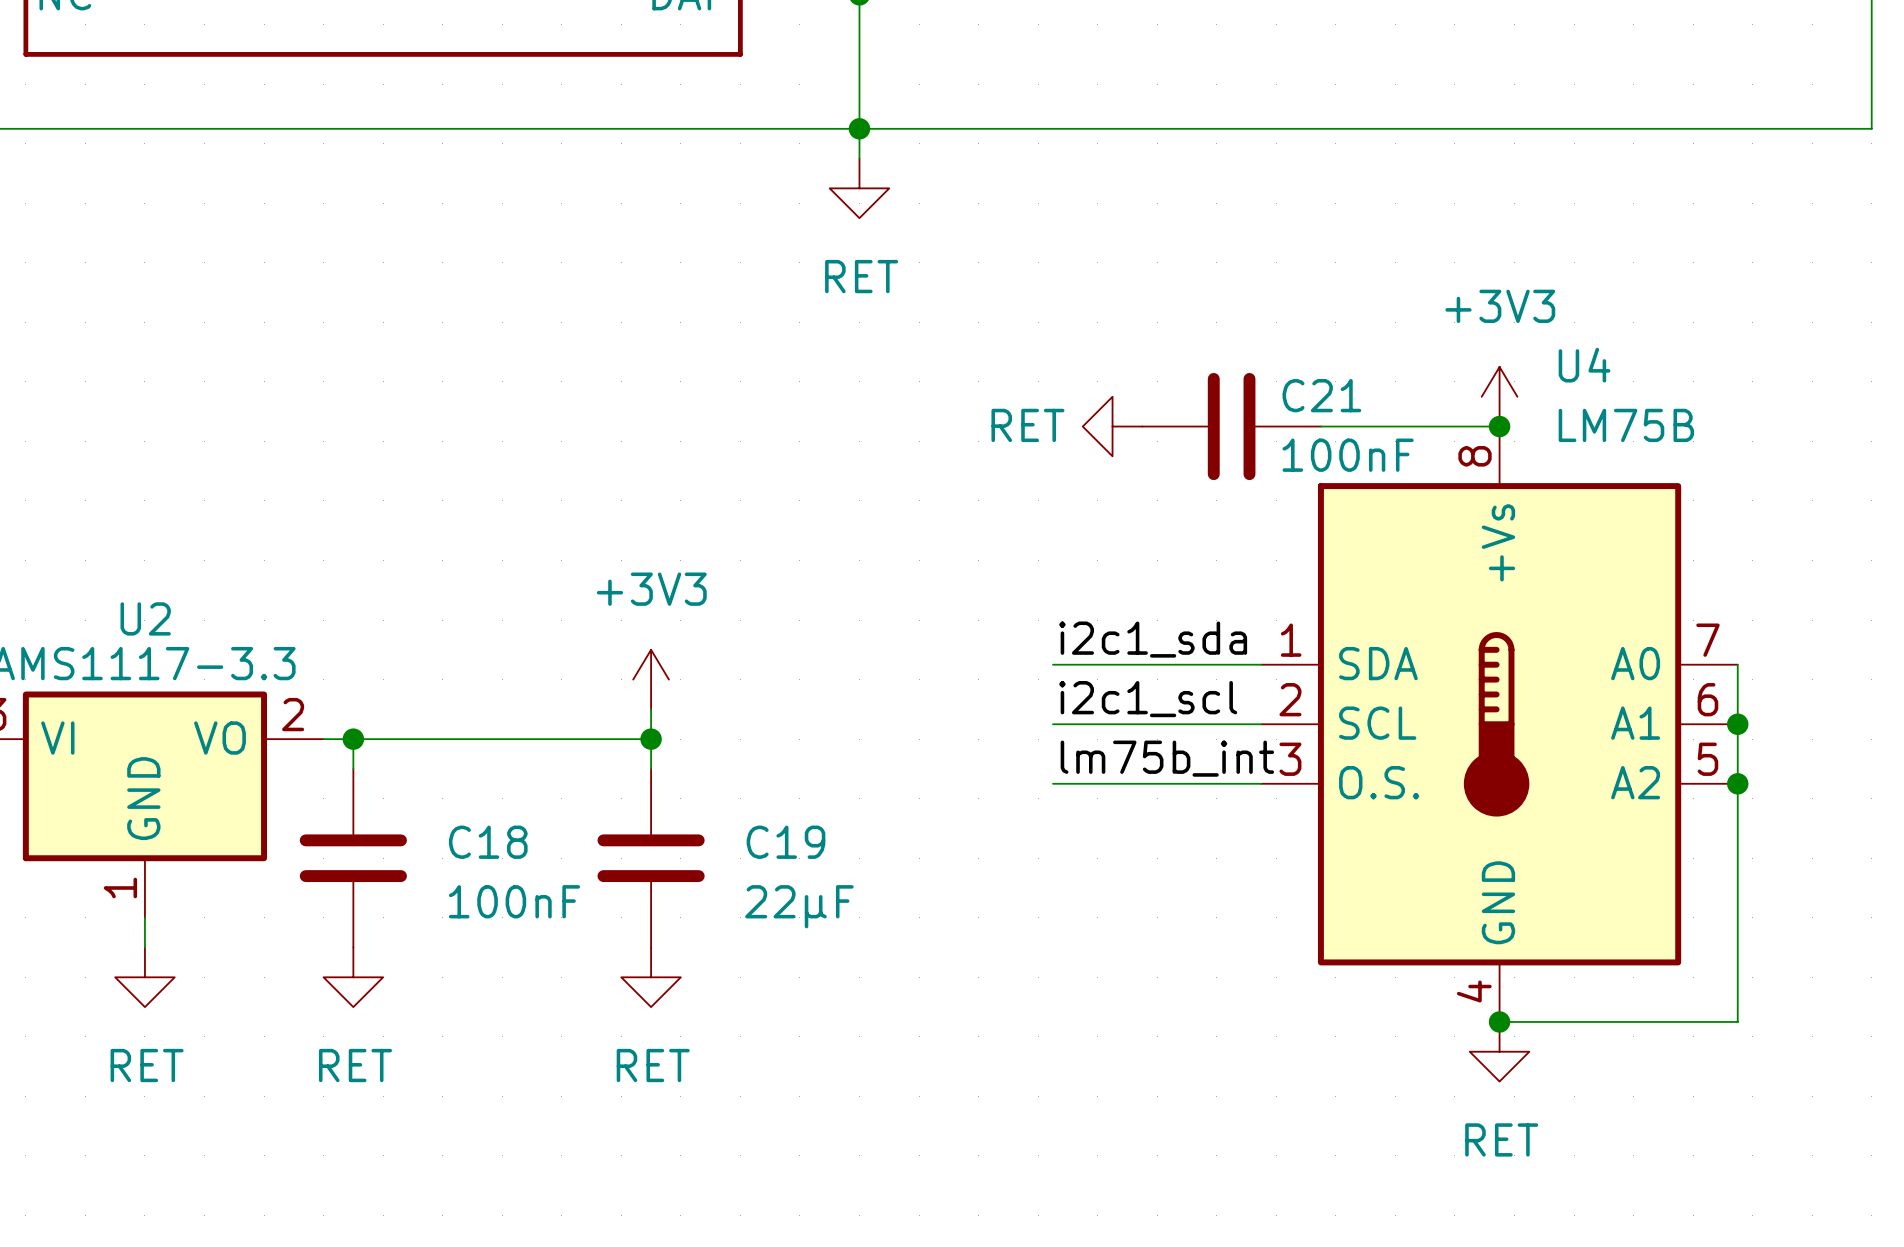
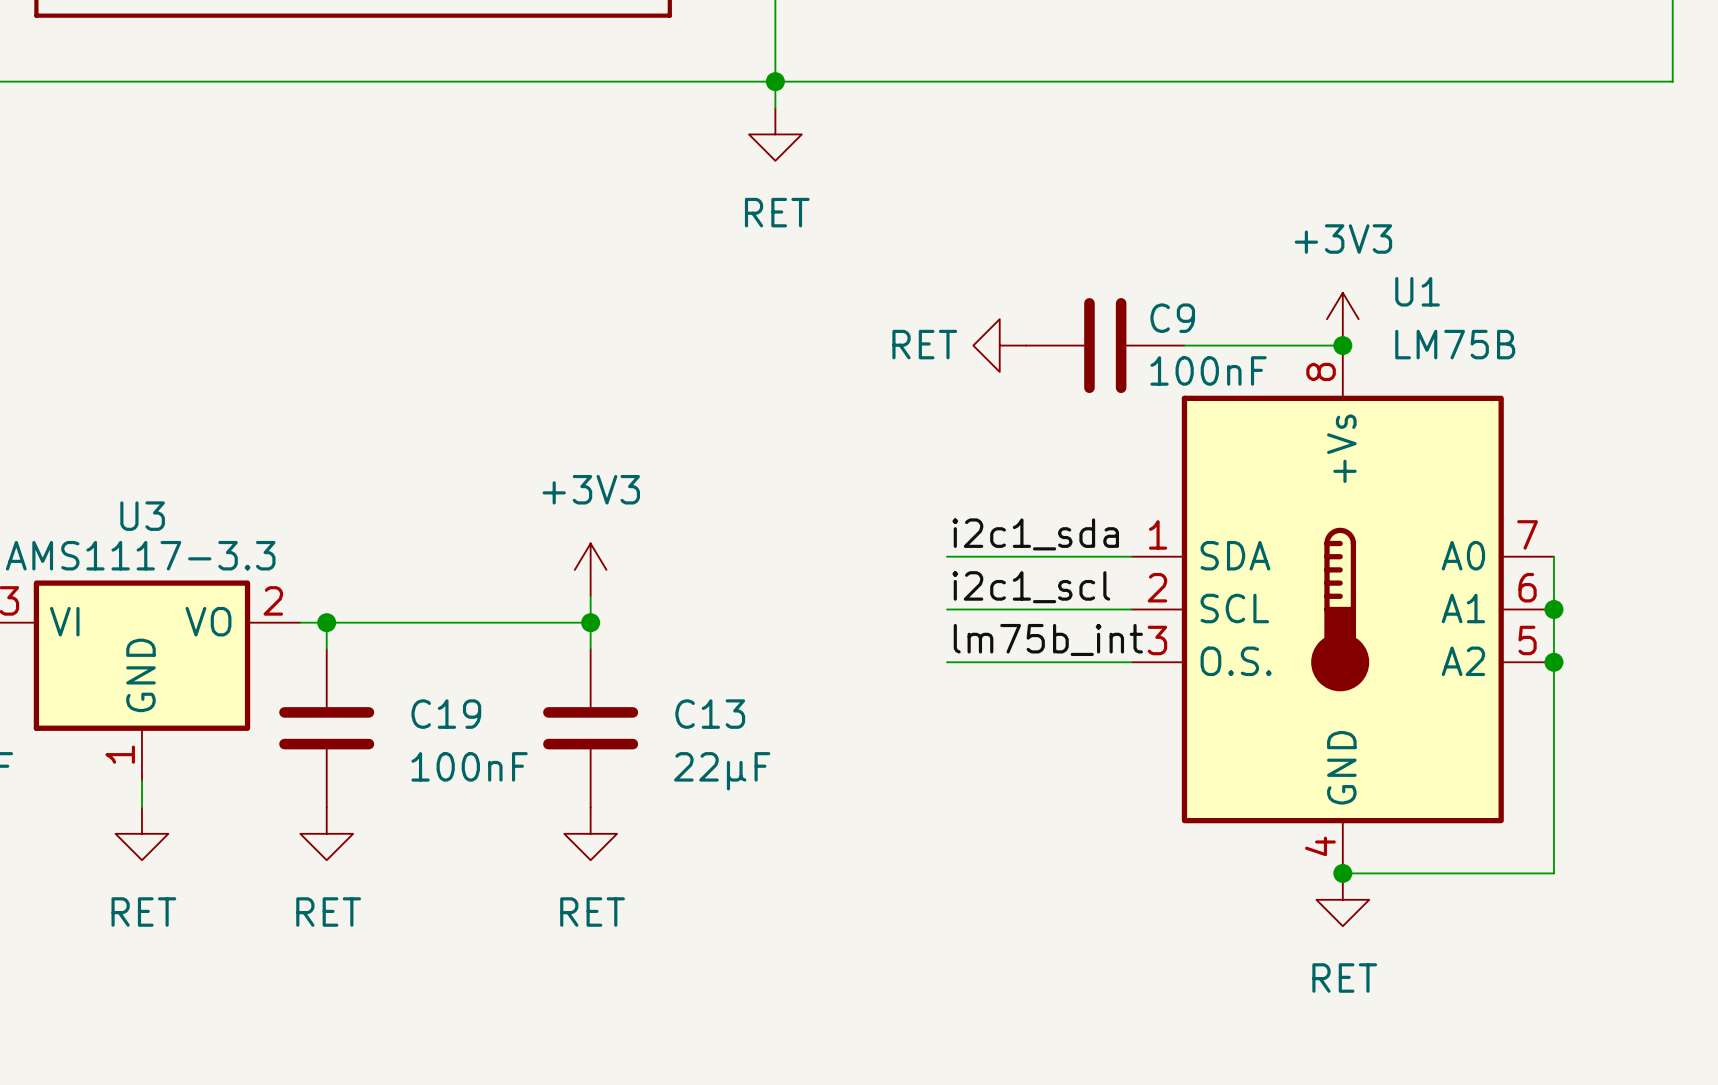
U4 name: U4 (1584, 365) -> U1 (1417, 291)
C21 name: C21 (1321, 395) -> C9 (1172, 318)
U2 name: U2 (145, 618) -> U3 (142, 516)
C18 name: C18 (488, 842) -> C19 (446, 714)
C19 name: C19 (785, 842) -> C13 (710, 714)

